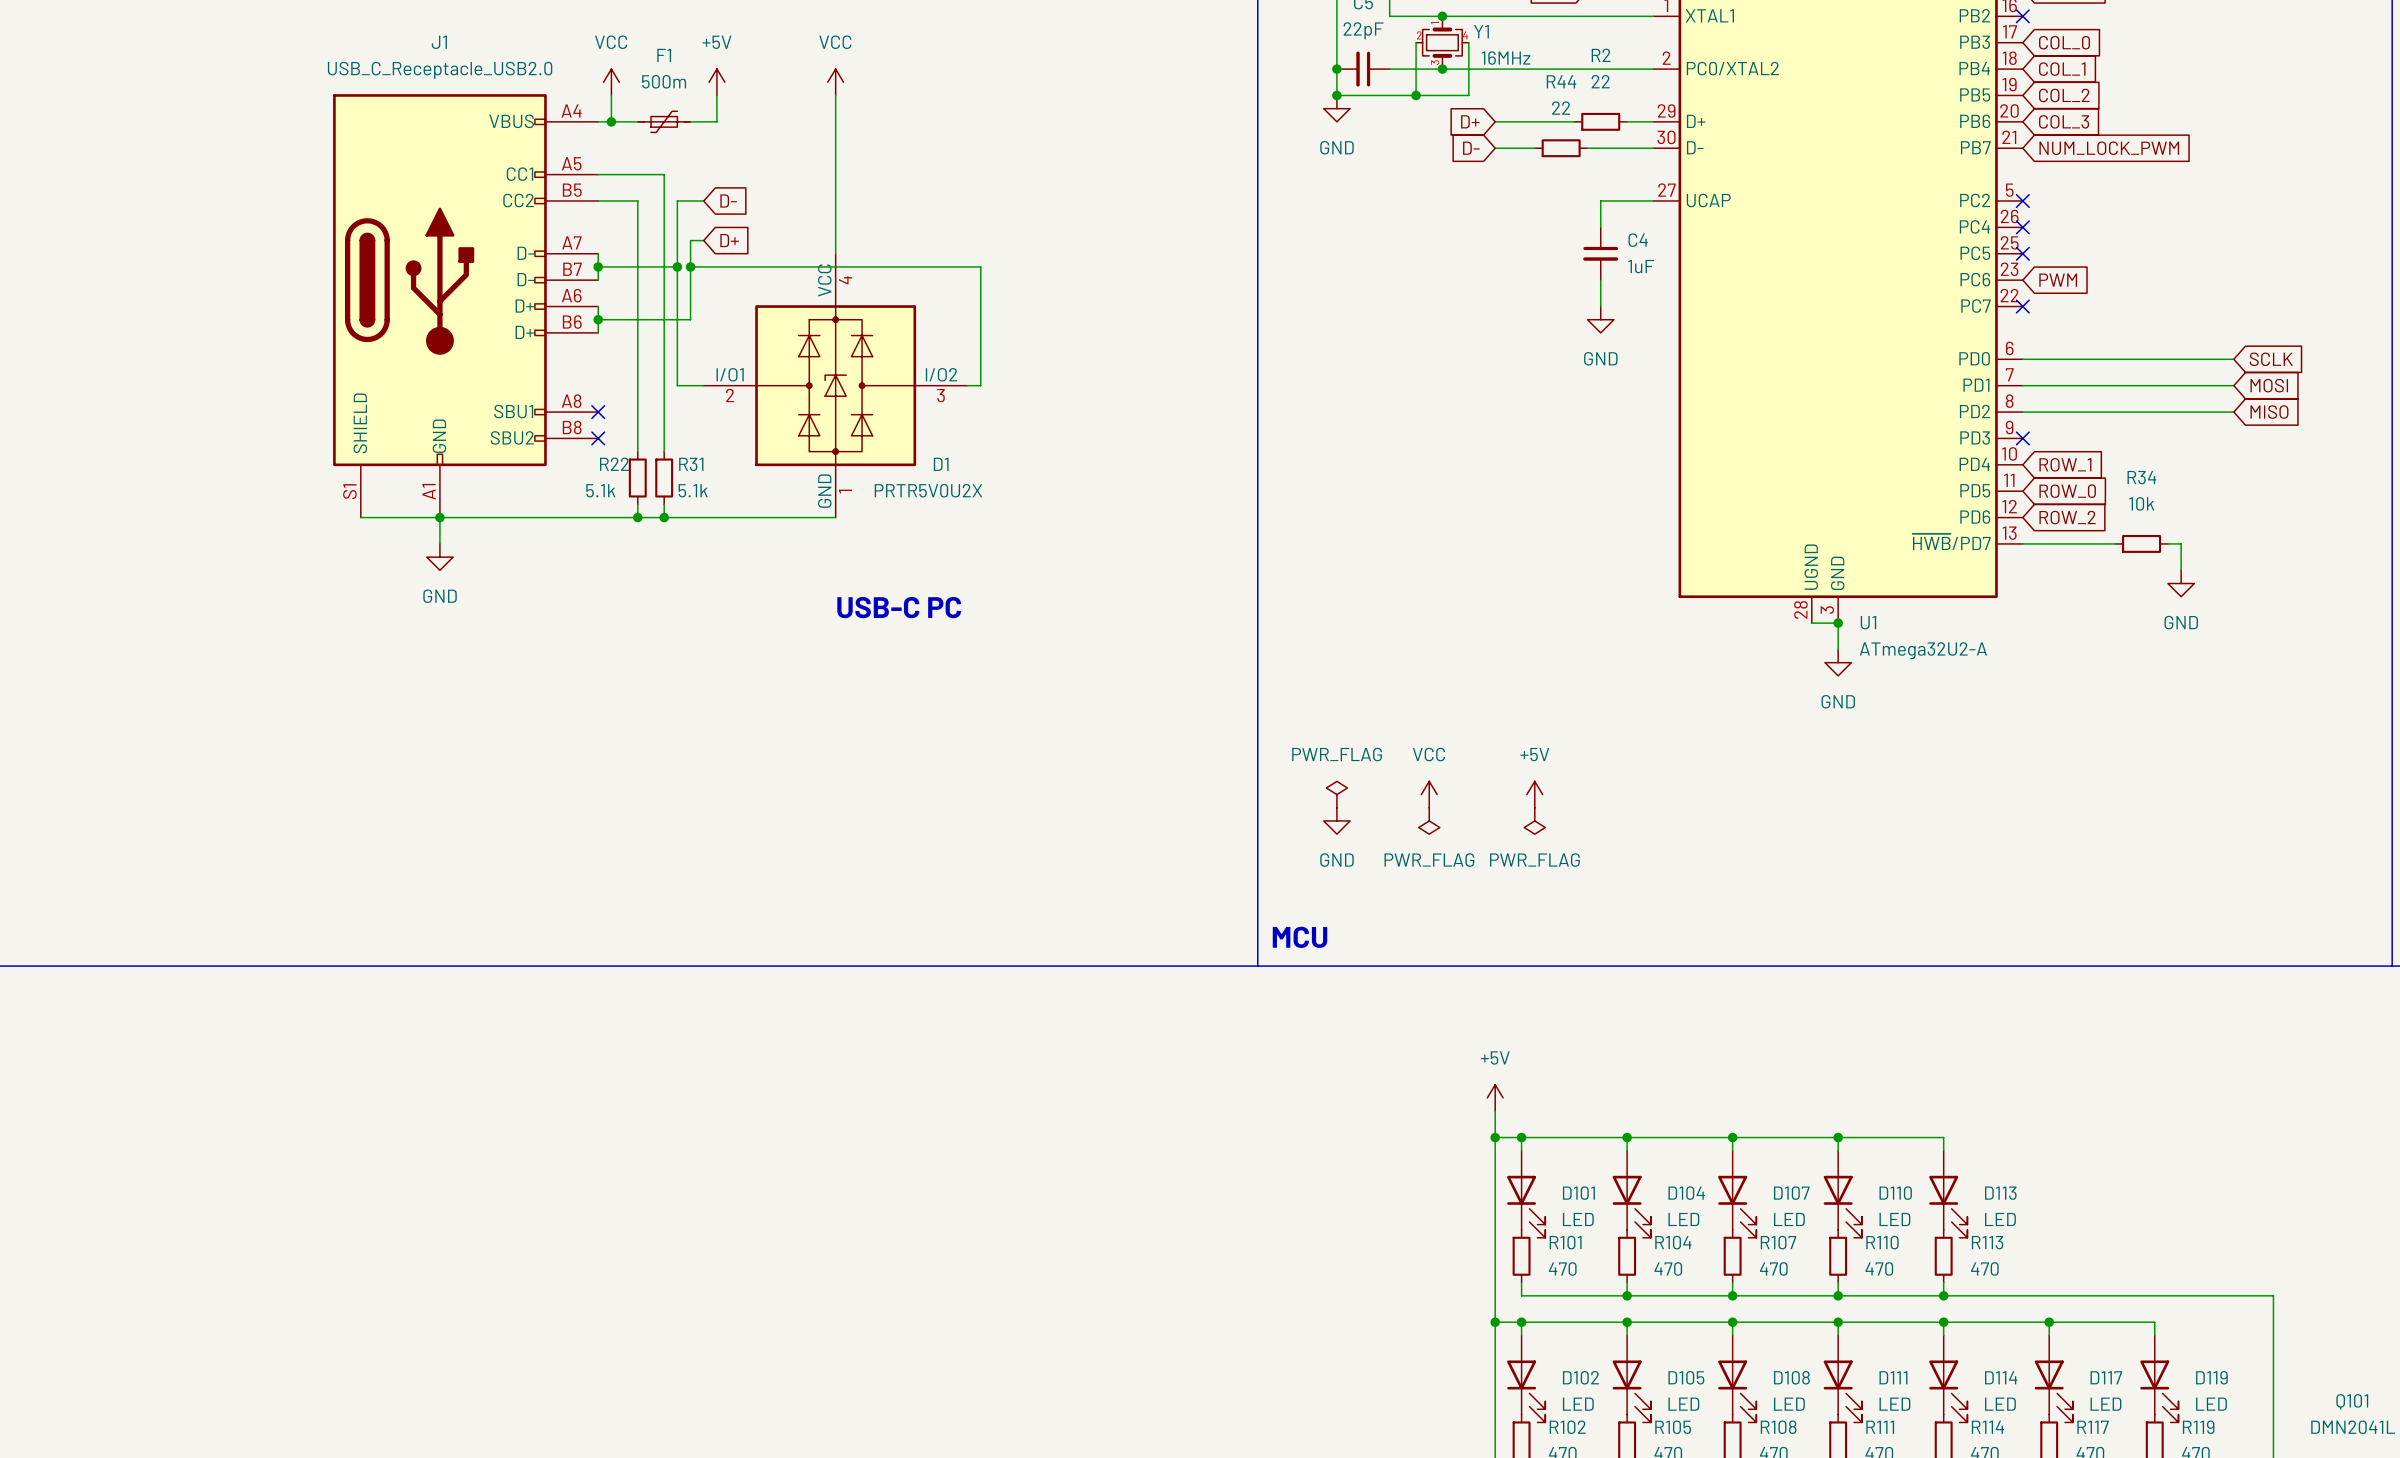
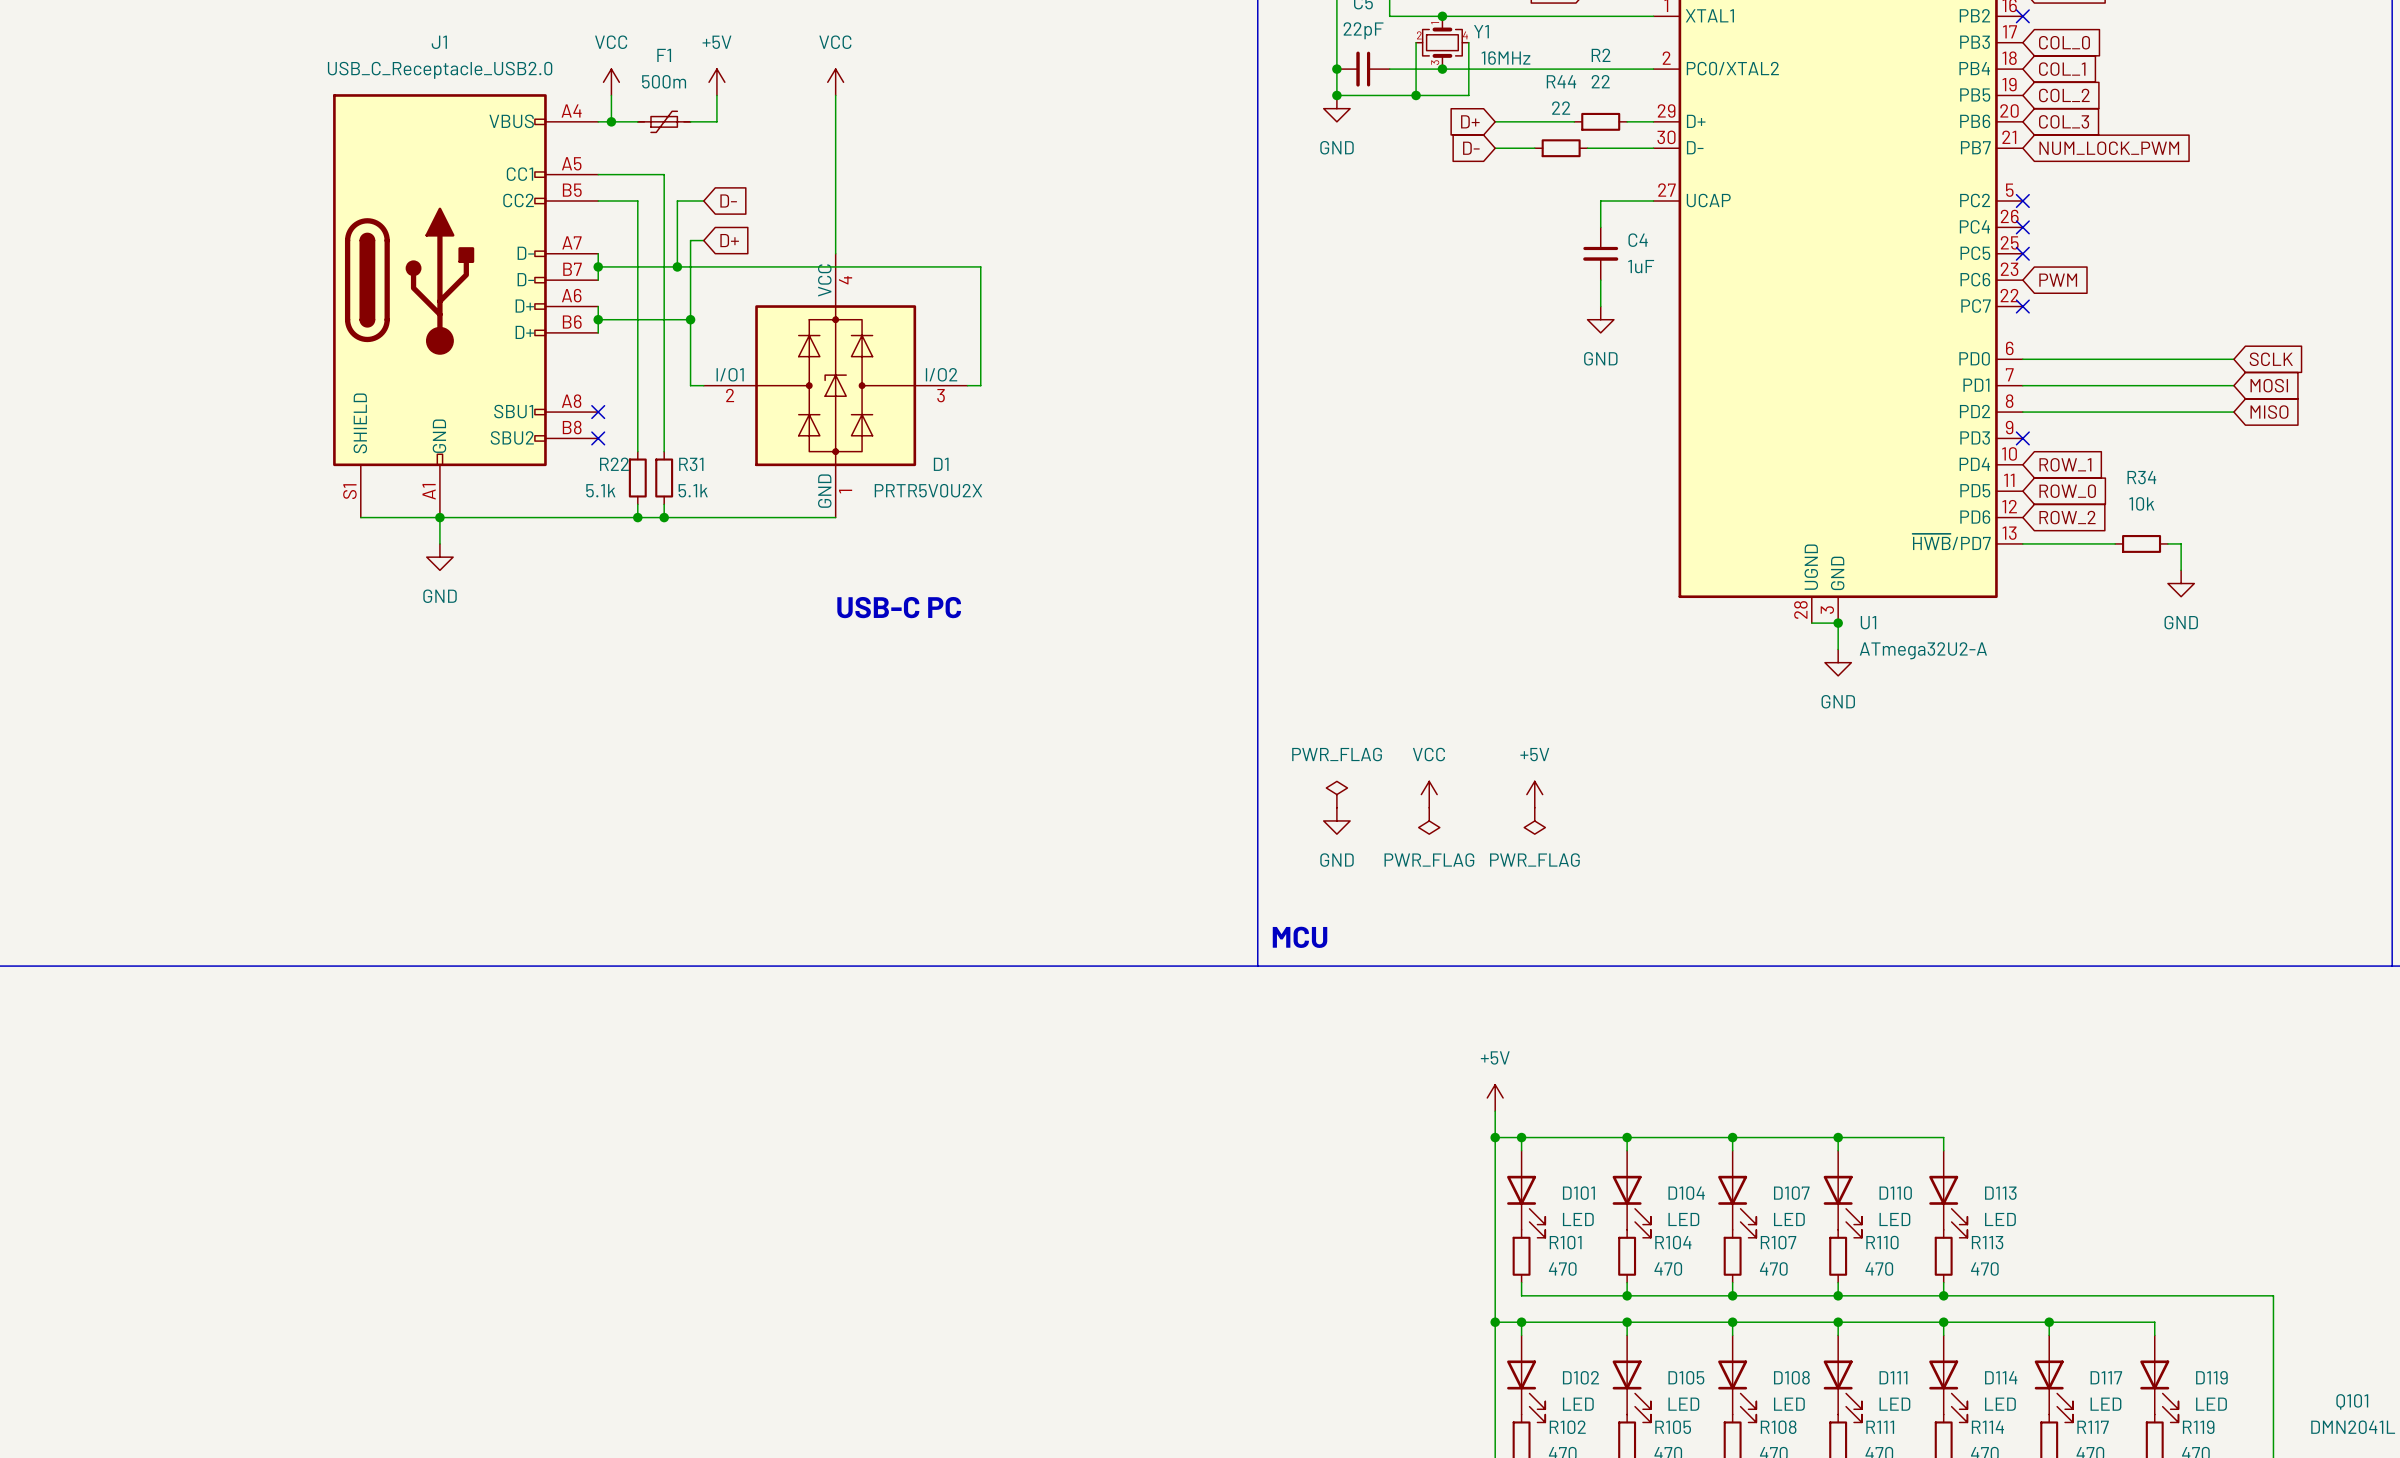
wire: (677, 266) (677, 385) (690, 385) -> (690, 319) (690, 385)
junction position: (690, 266) -> (690, 319)

